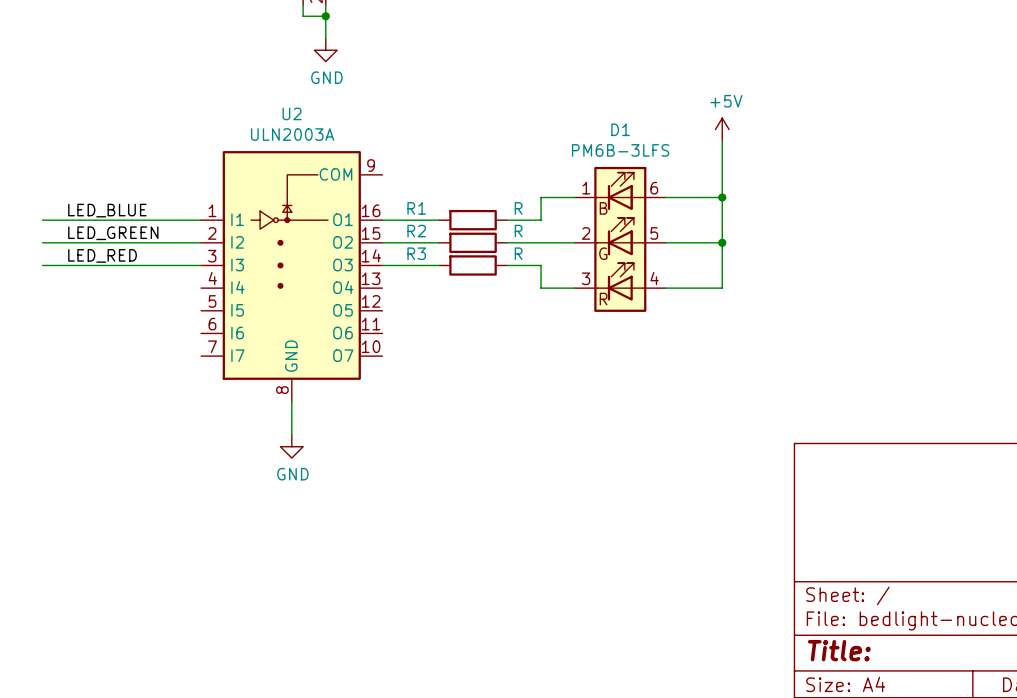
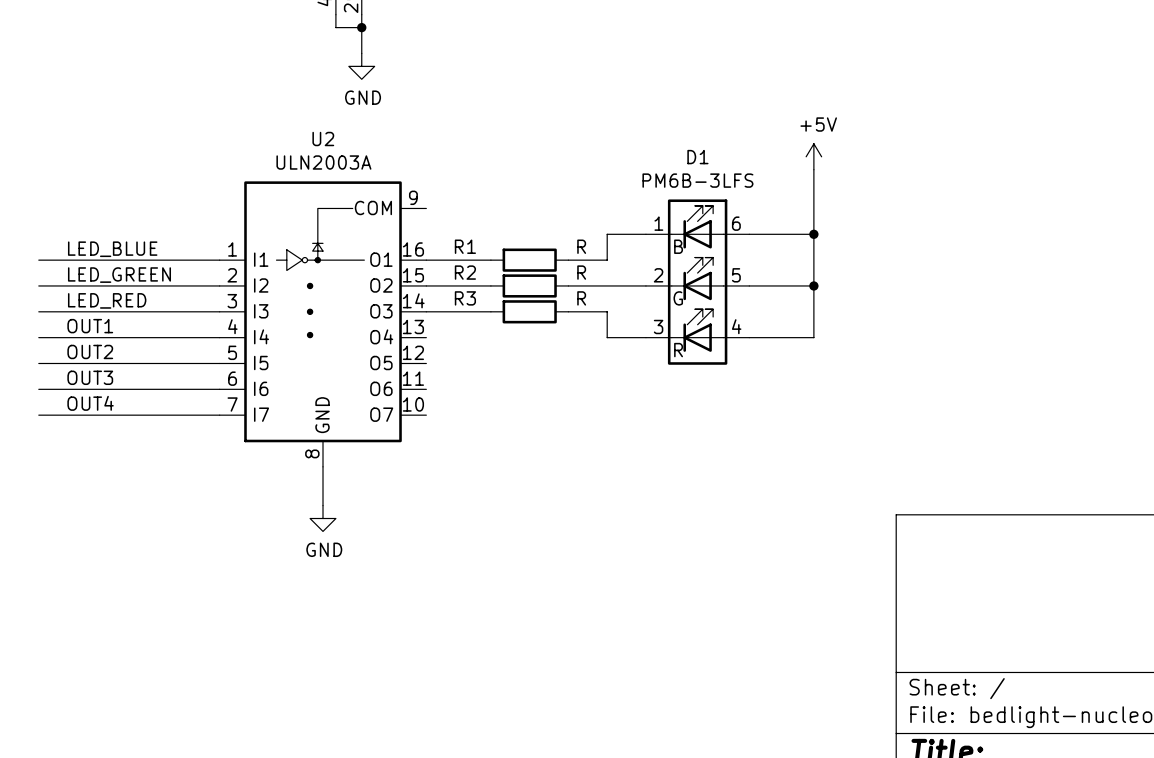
label: none -> OUT1 (90, 326)
wire: none -> (38, 337) (219, 337)
label: none -> OUT2 (90, 351)
wire: none -> (38, 363) (219, 363)
label: none -> OUT3 (90, 377)
wire: none -> (38, 389) (219, 389)
label: none -> OUT4 (90, 403)
wire: none -> (38, 415) (219, 415)

